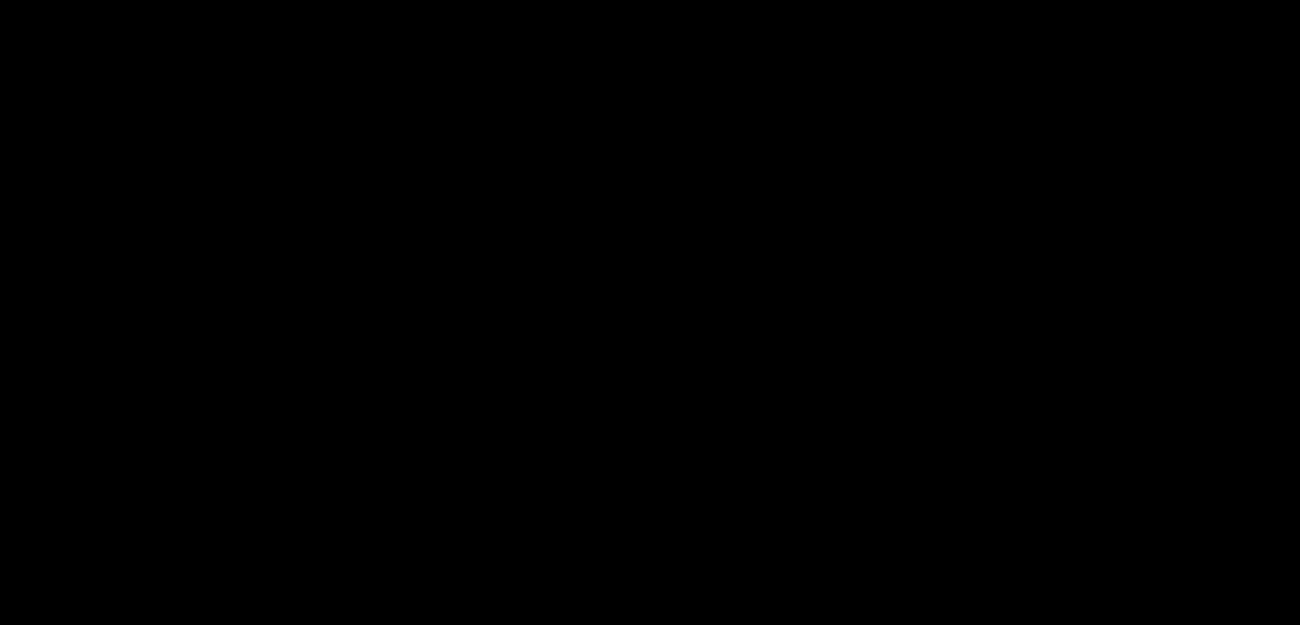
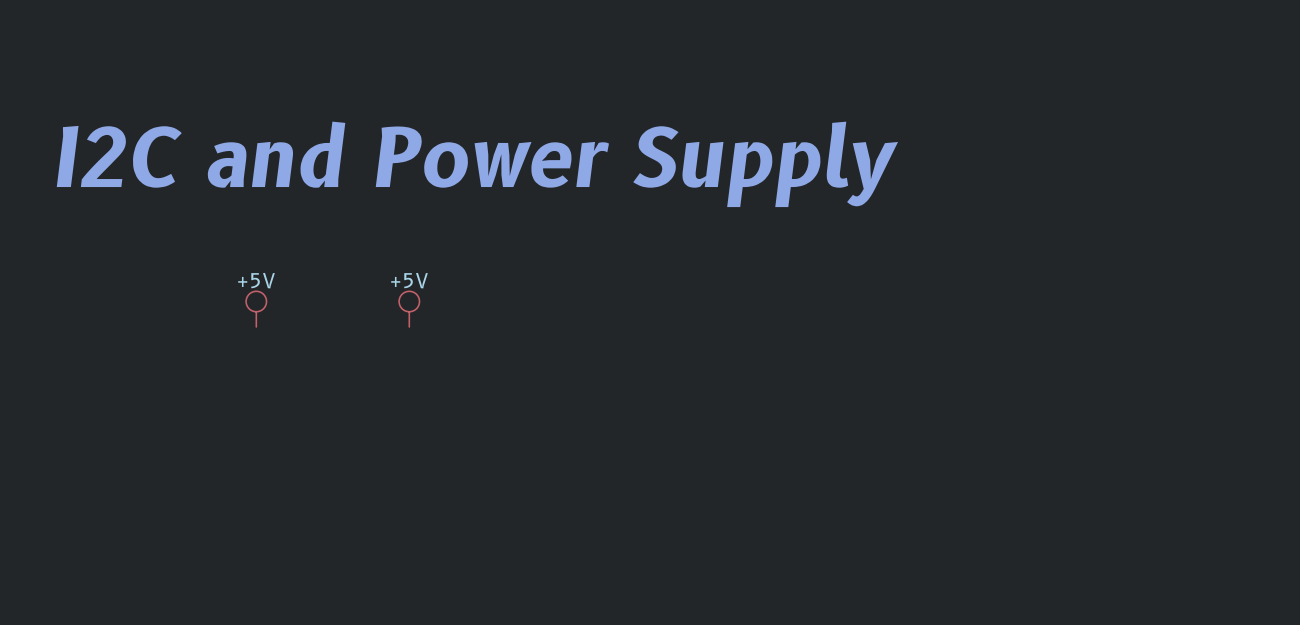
text: none -> I2C and Power Supply (477, 164)
power symbol: none -> +5V (256, 309)
power symbol: none -> +5V (409, 309)

